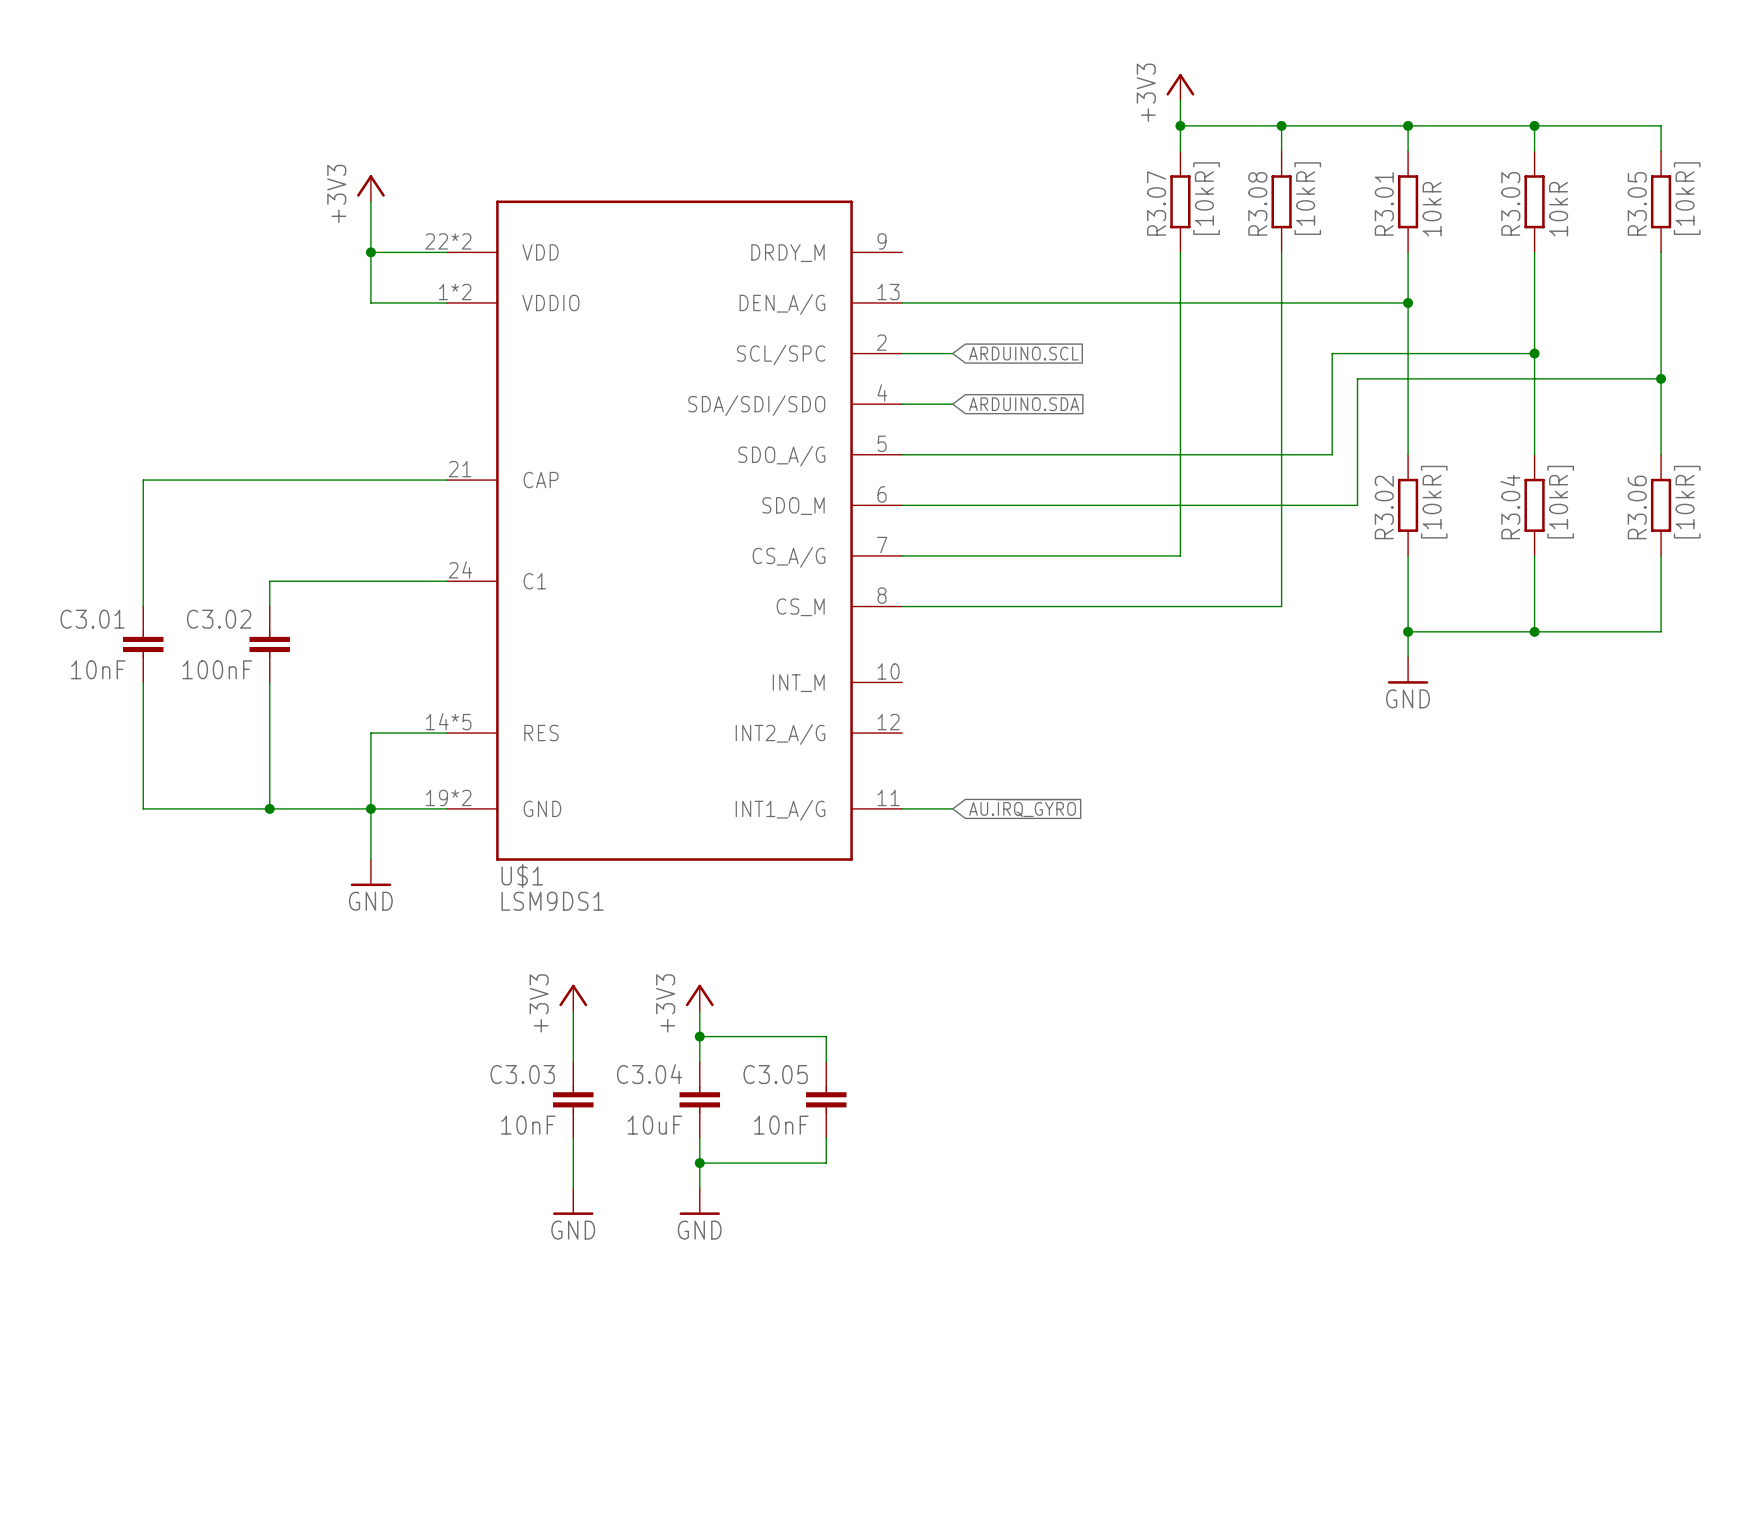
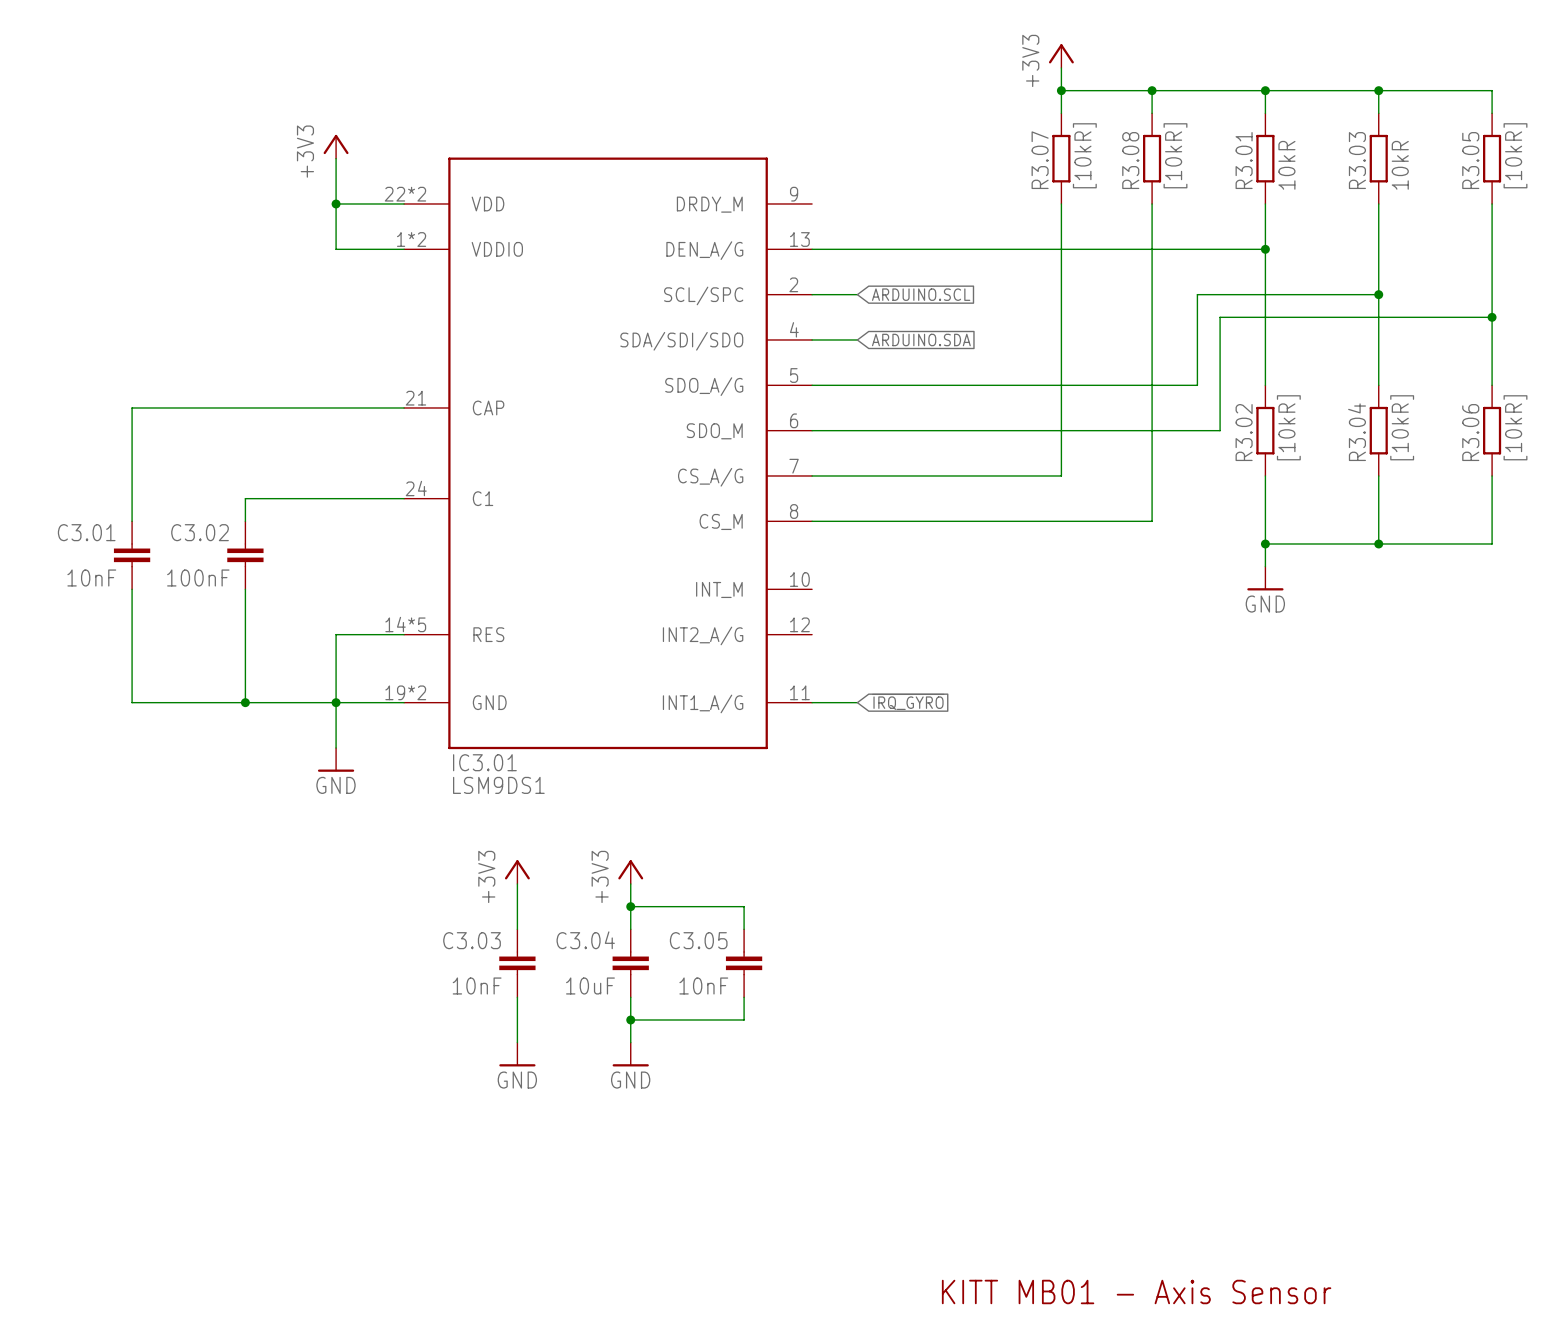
global label: AU.~{IRQ_GYRO} (1023, 808) -> ~{IRQ_GYRO} (908, 701)
U$1 name: U$1 (522, 875) -> IC3.01 (484, 762)
text: none -> KITT MB01 - Axis Sensor (1136, 1291)

